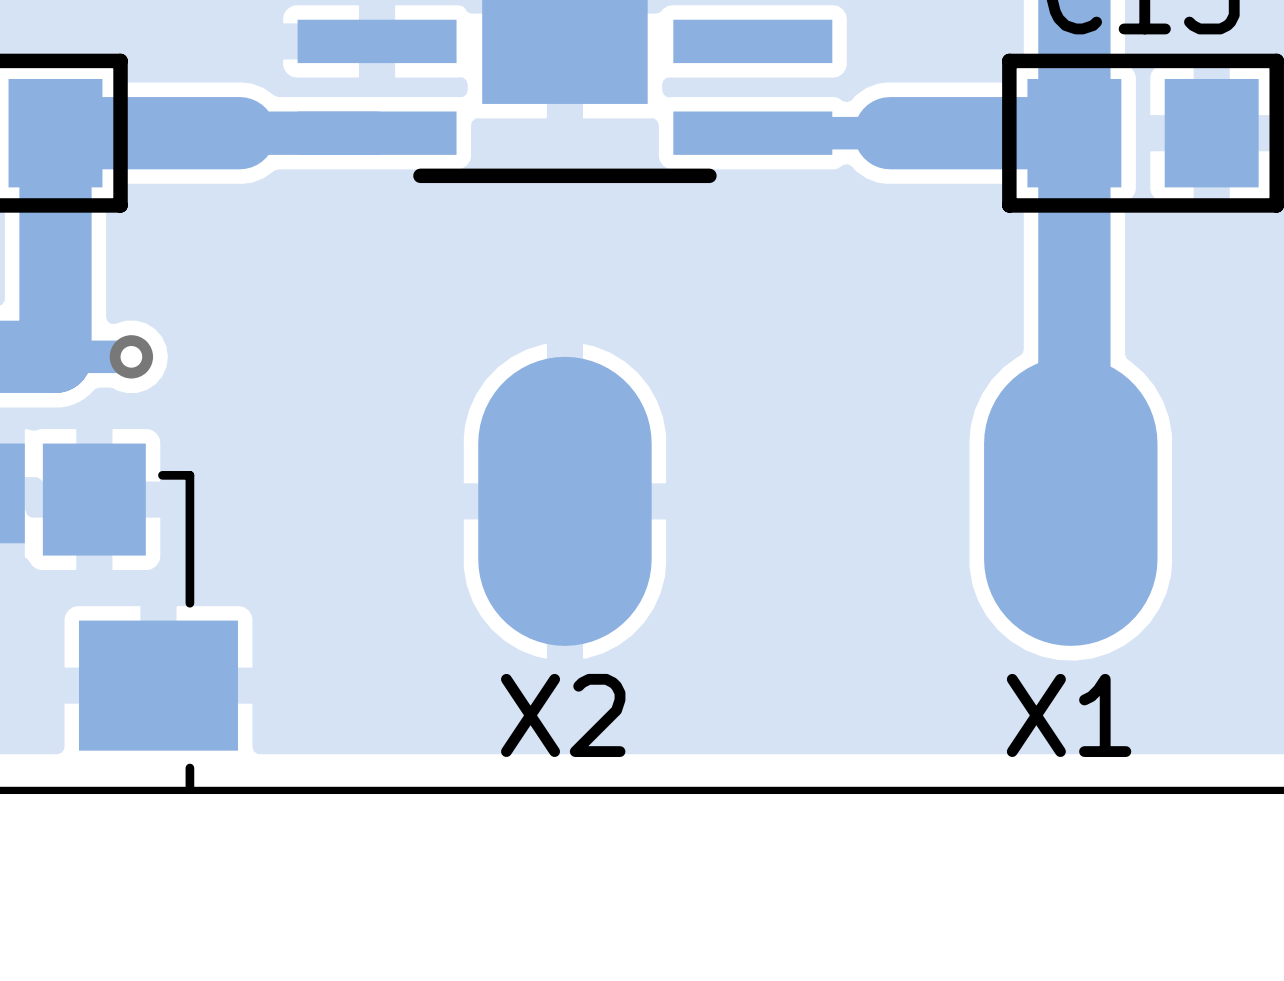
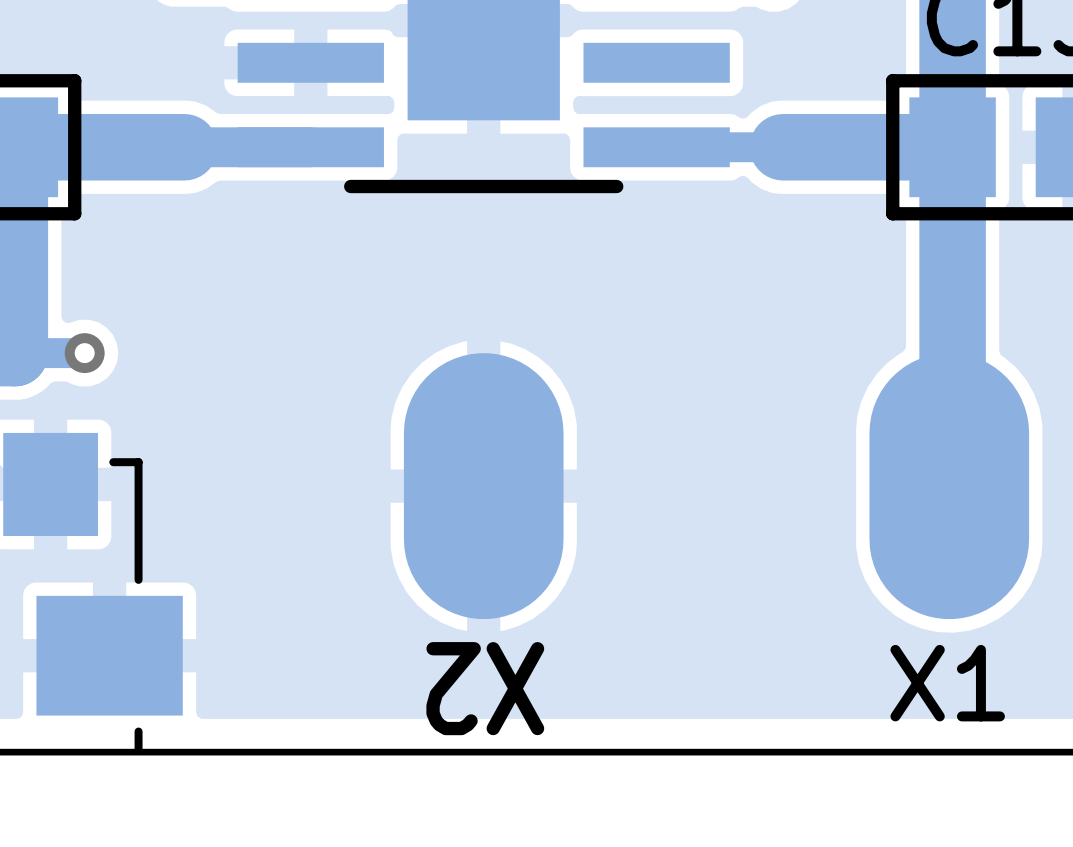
X2 name rotation: 0° (563, 715) -> 180° (485, 688)

